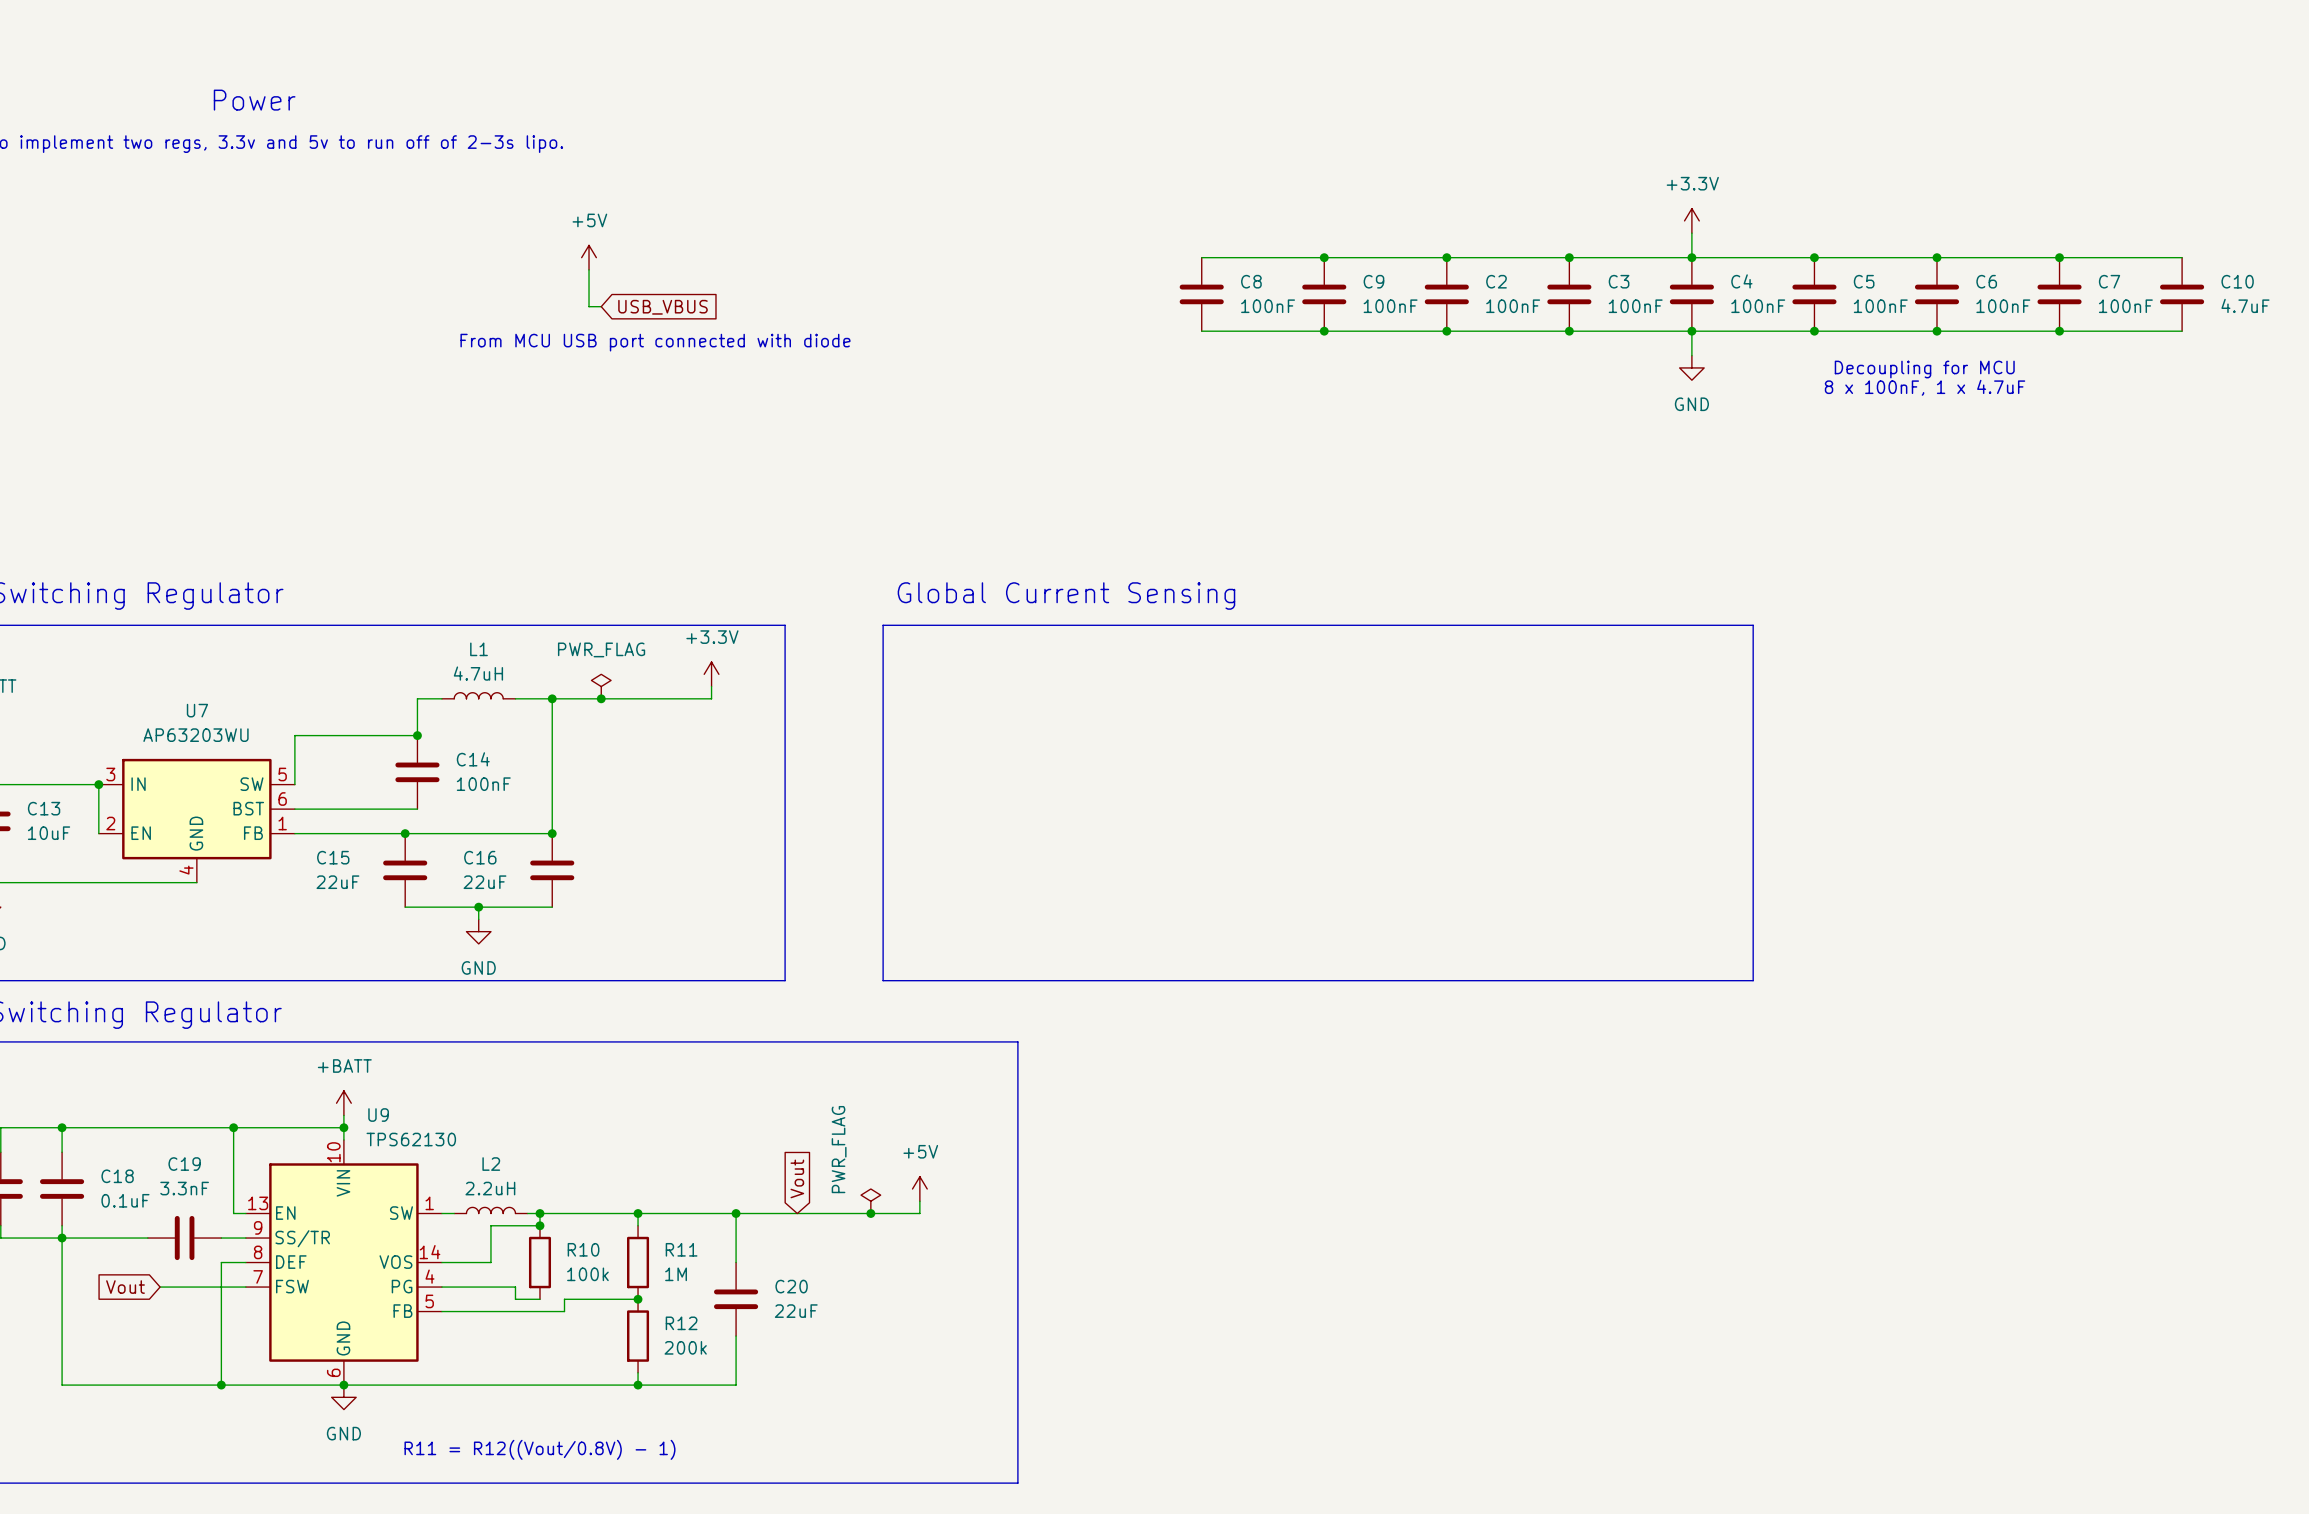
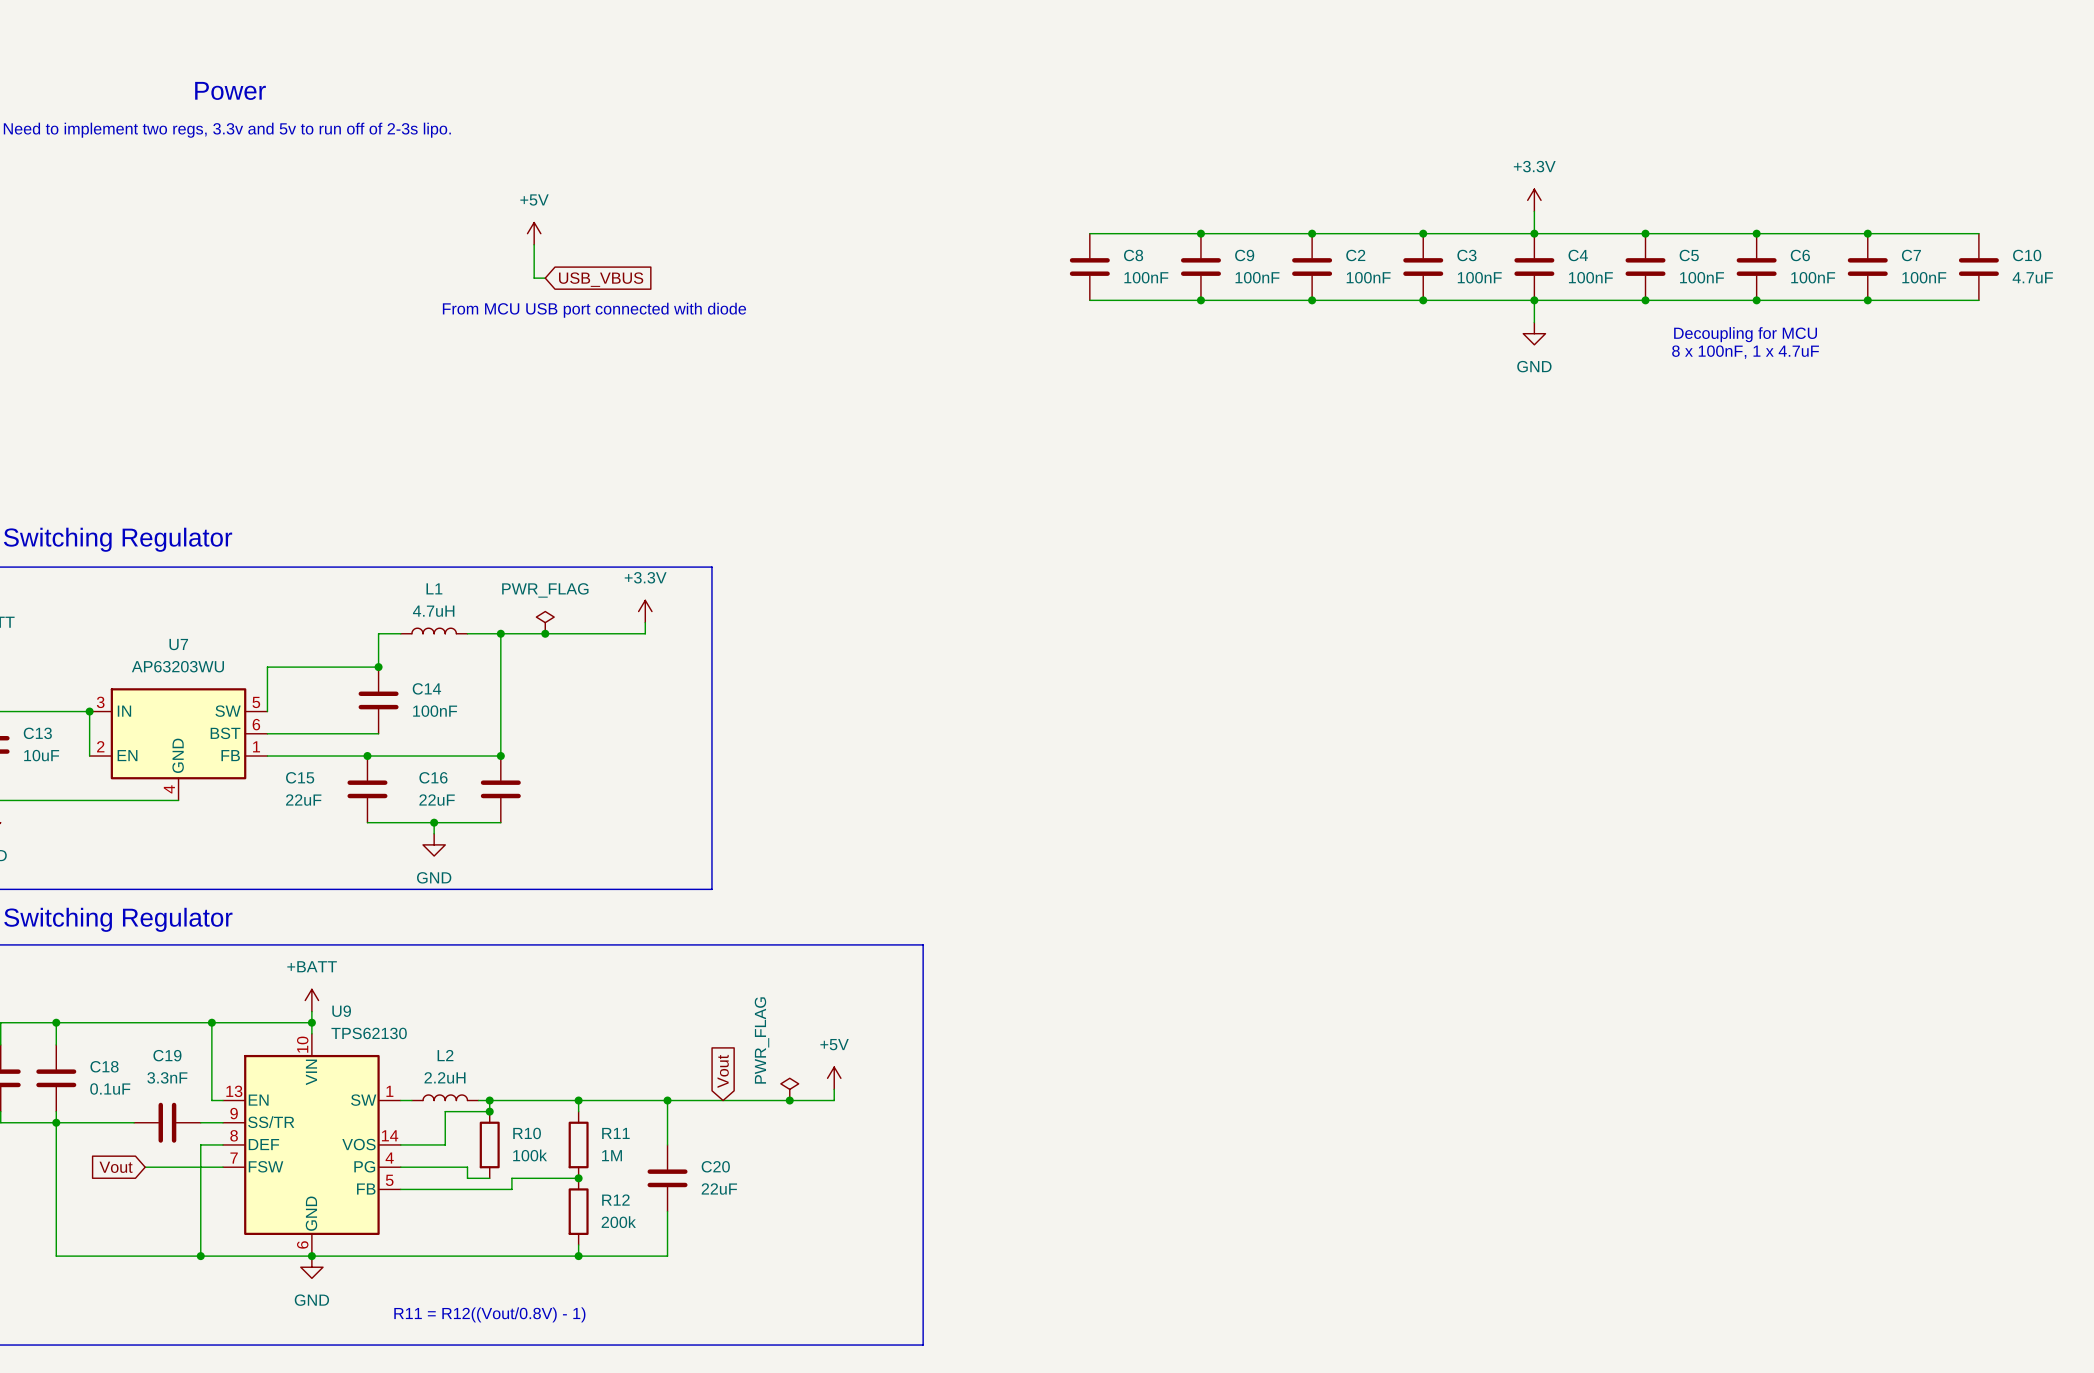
text: Global Current Sensing (1066, 596) -> none
line: (883, 625) (1753, 625) (1753, 980) (883, 980) (883, 625) -> none

